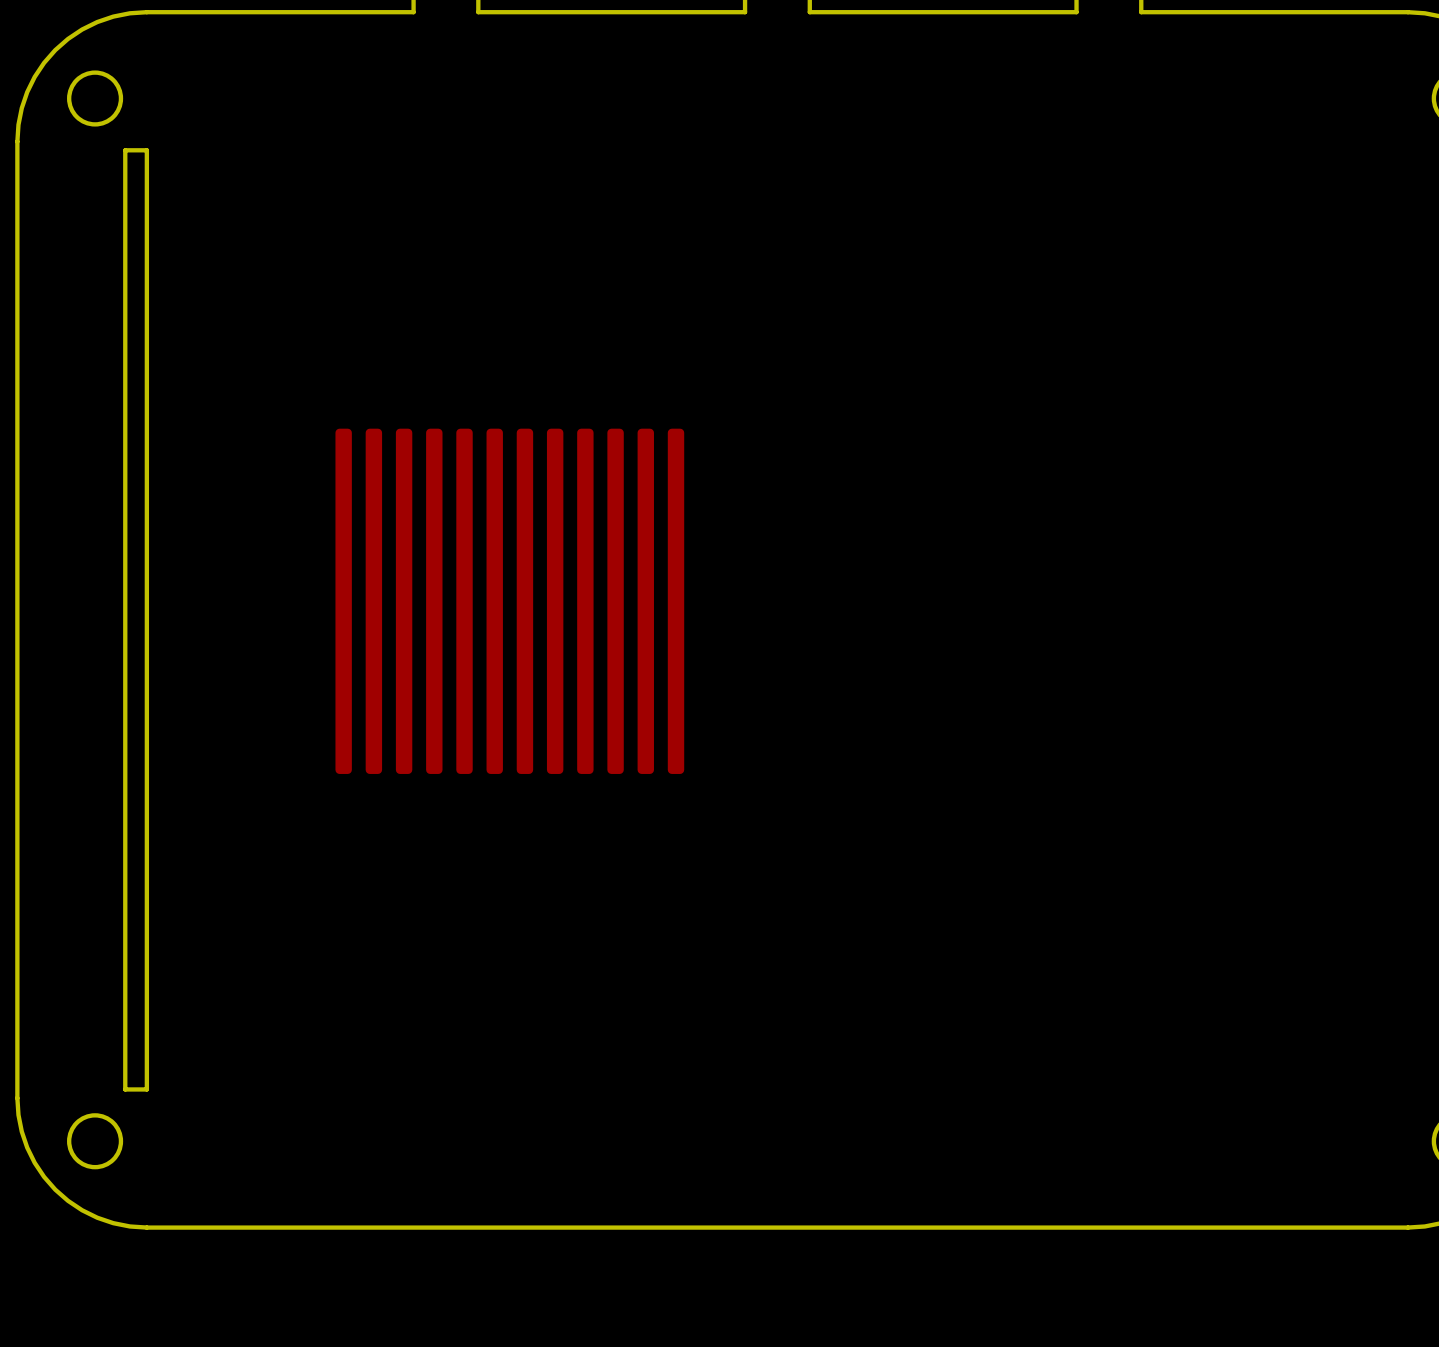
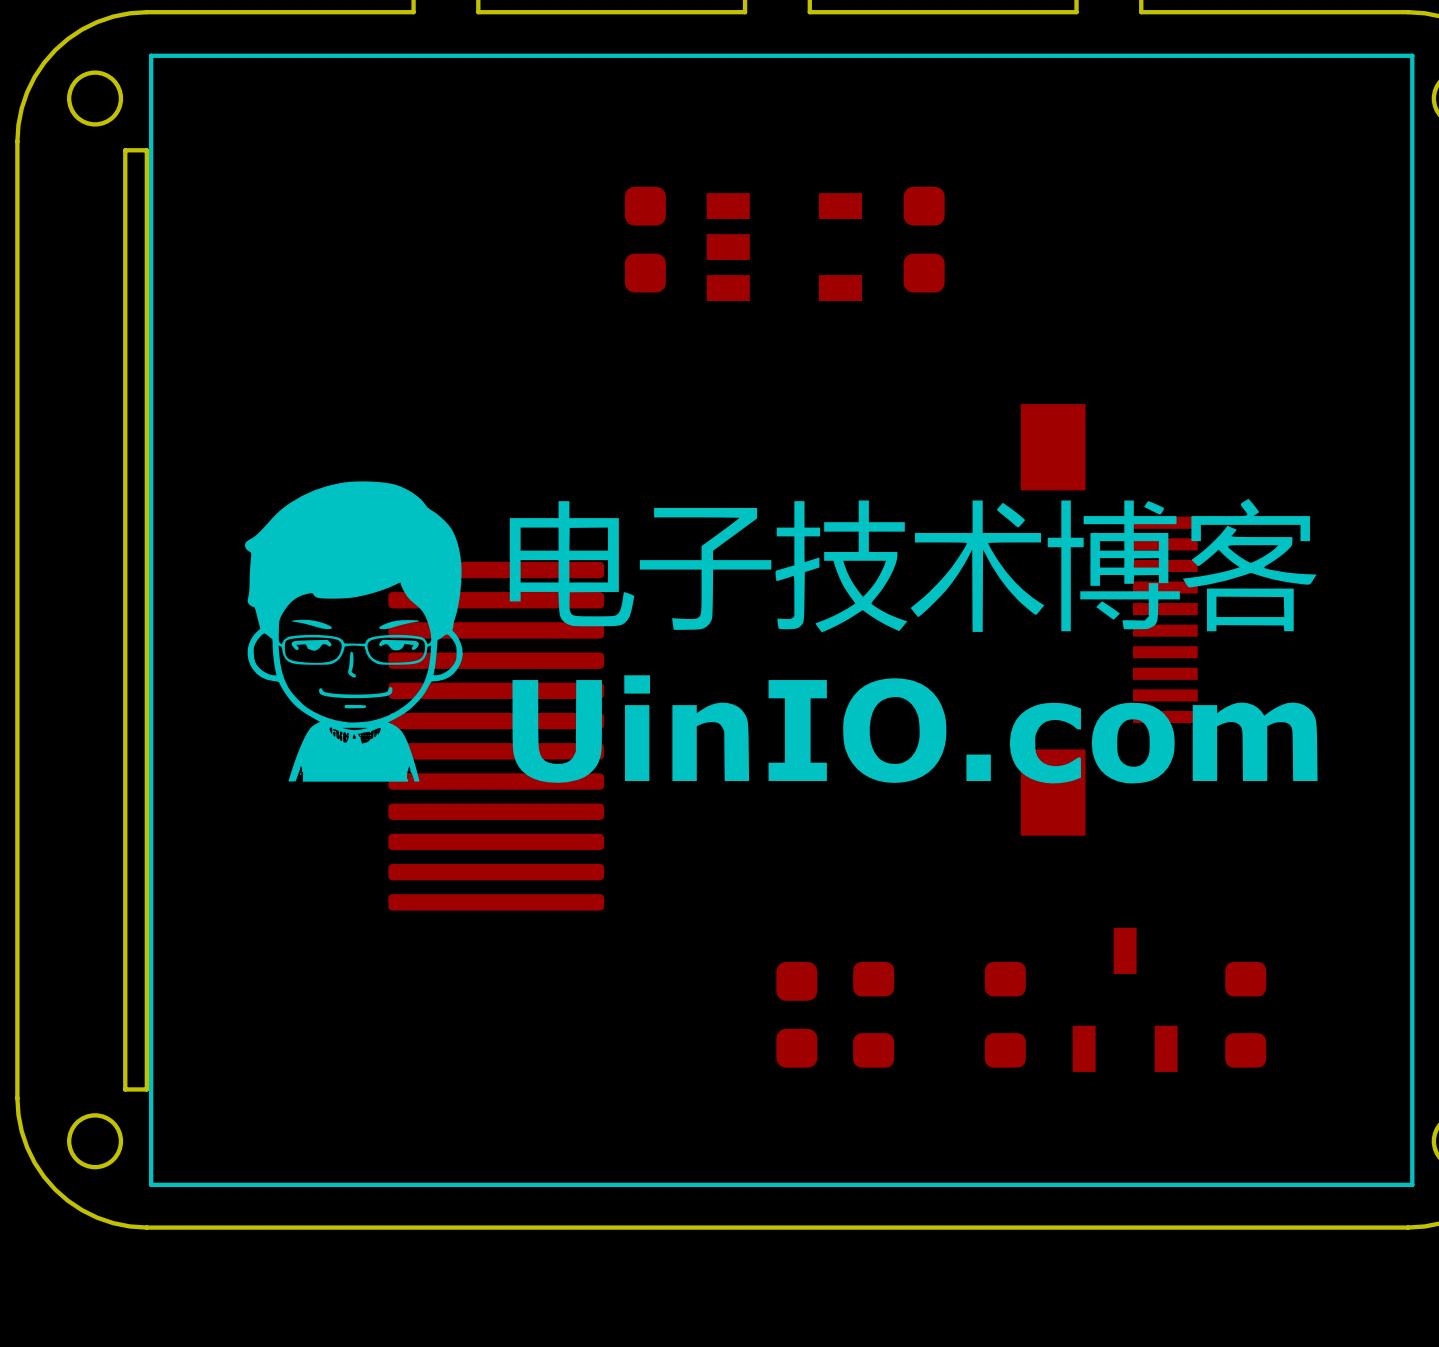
line: none -> (1412, 55) (151, 55) (151, 1184) (1412, 1184) (1412, 55)
part: none -> (645, 239)
part: none -> (924, 239)
part: none -> (784, 247)
drawing: none -> [245, 481, 1318, 784]
part: (509, 601) -> none
part: none -> (1109, 619)
part: none -> (496, 736)
part: none -> (1125, 999)
part: none -> (796, 1014)
part: none -> (873, 1014)
part: none -> (1005, 1014)
part: none -> (1245, 1014)

